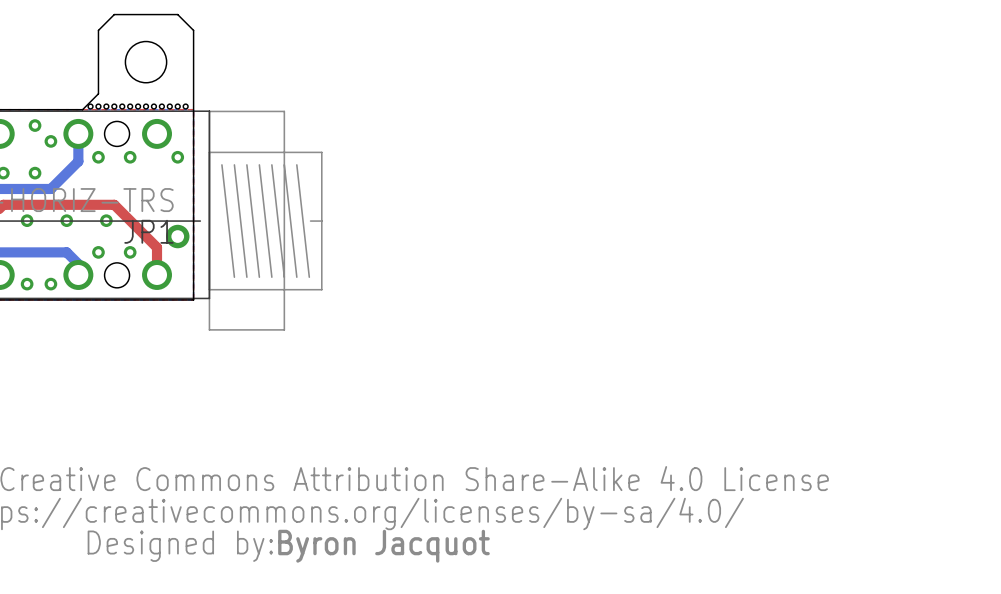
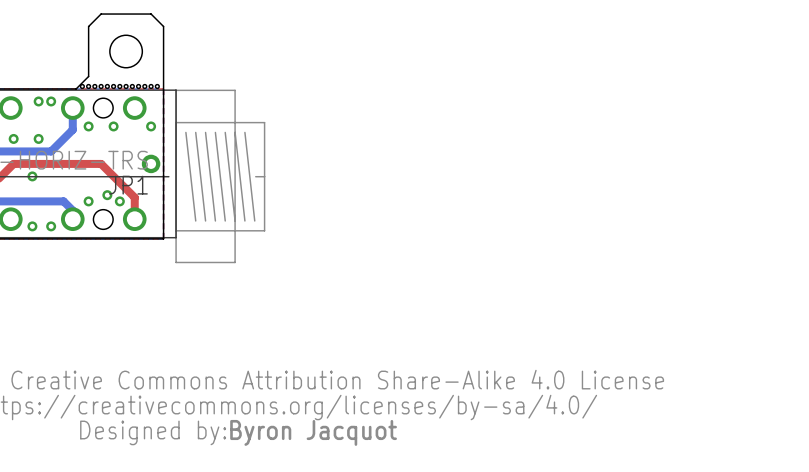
via position: (50, 141) -> (51, 101)
via: (66, 220) -> none
via: (106, 220) -> none
part position: (177, 236) -> (151, 163)
via: none -> (107, 195)
via: (130, 252) -> none
via: none -> (119, 201)

